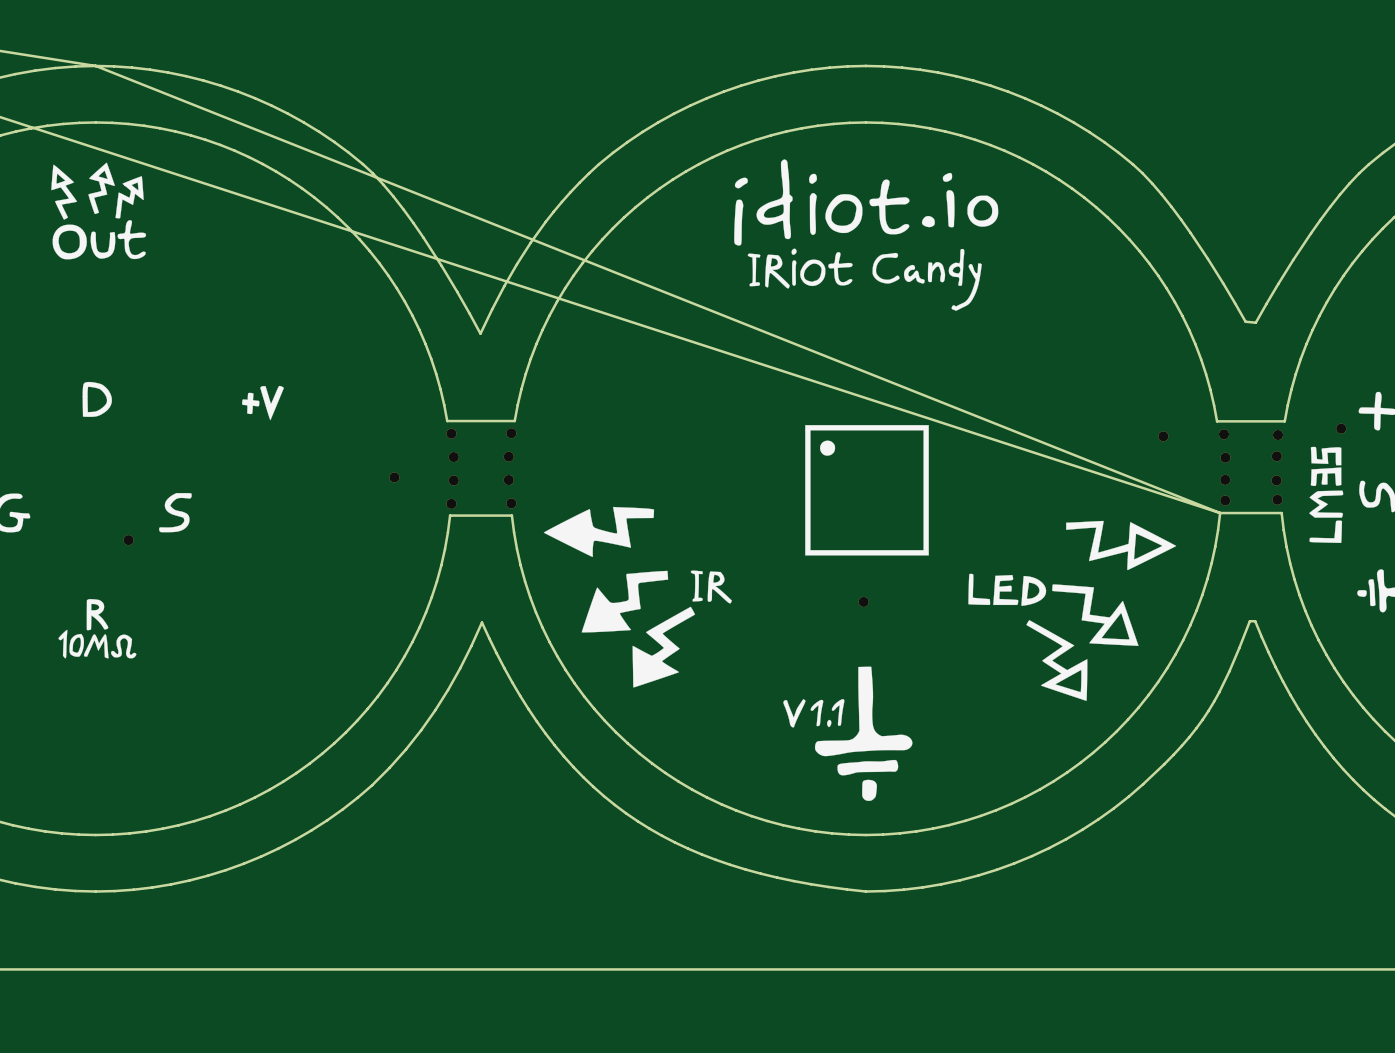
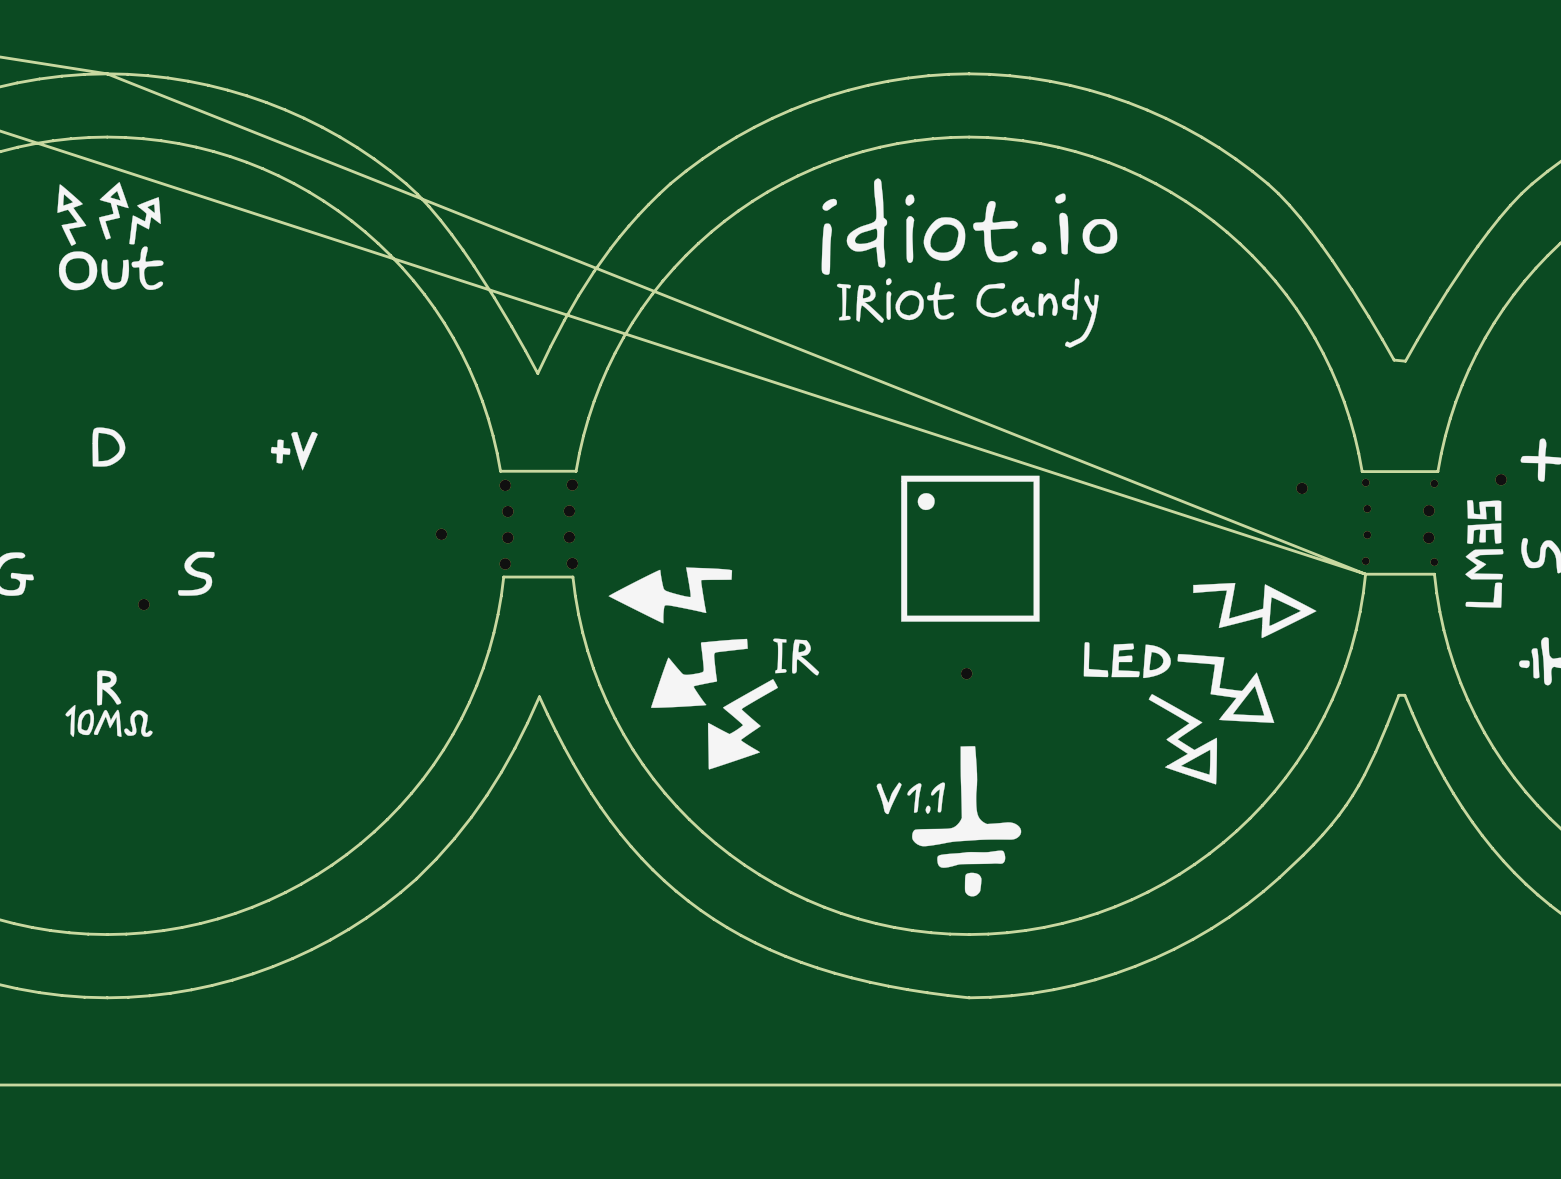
part footprint: [1218, 429, 1230, 440] -> [1361, 478, 1370, 487]
part footprint: [1272, 429, 1284, 441] -> [1430, 479, 1439, 488]
part footprint: [1220, 452, 1231, 463] -> [1363, 504, 1372, 513]
part footprint: [1220, 474, 1231, 485] -> [1363, 531, 1372, 539]
part footprint: [1272, 494, 1283, 505] -> [1430, 558, 1439, 566]
part footprint: [1220, 495, 1231, 506] -> [1361, 557, 1370, 565]

